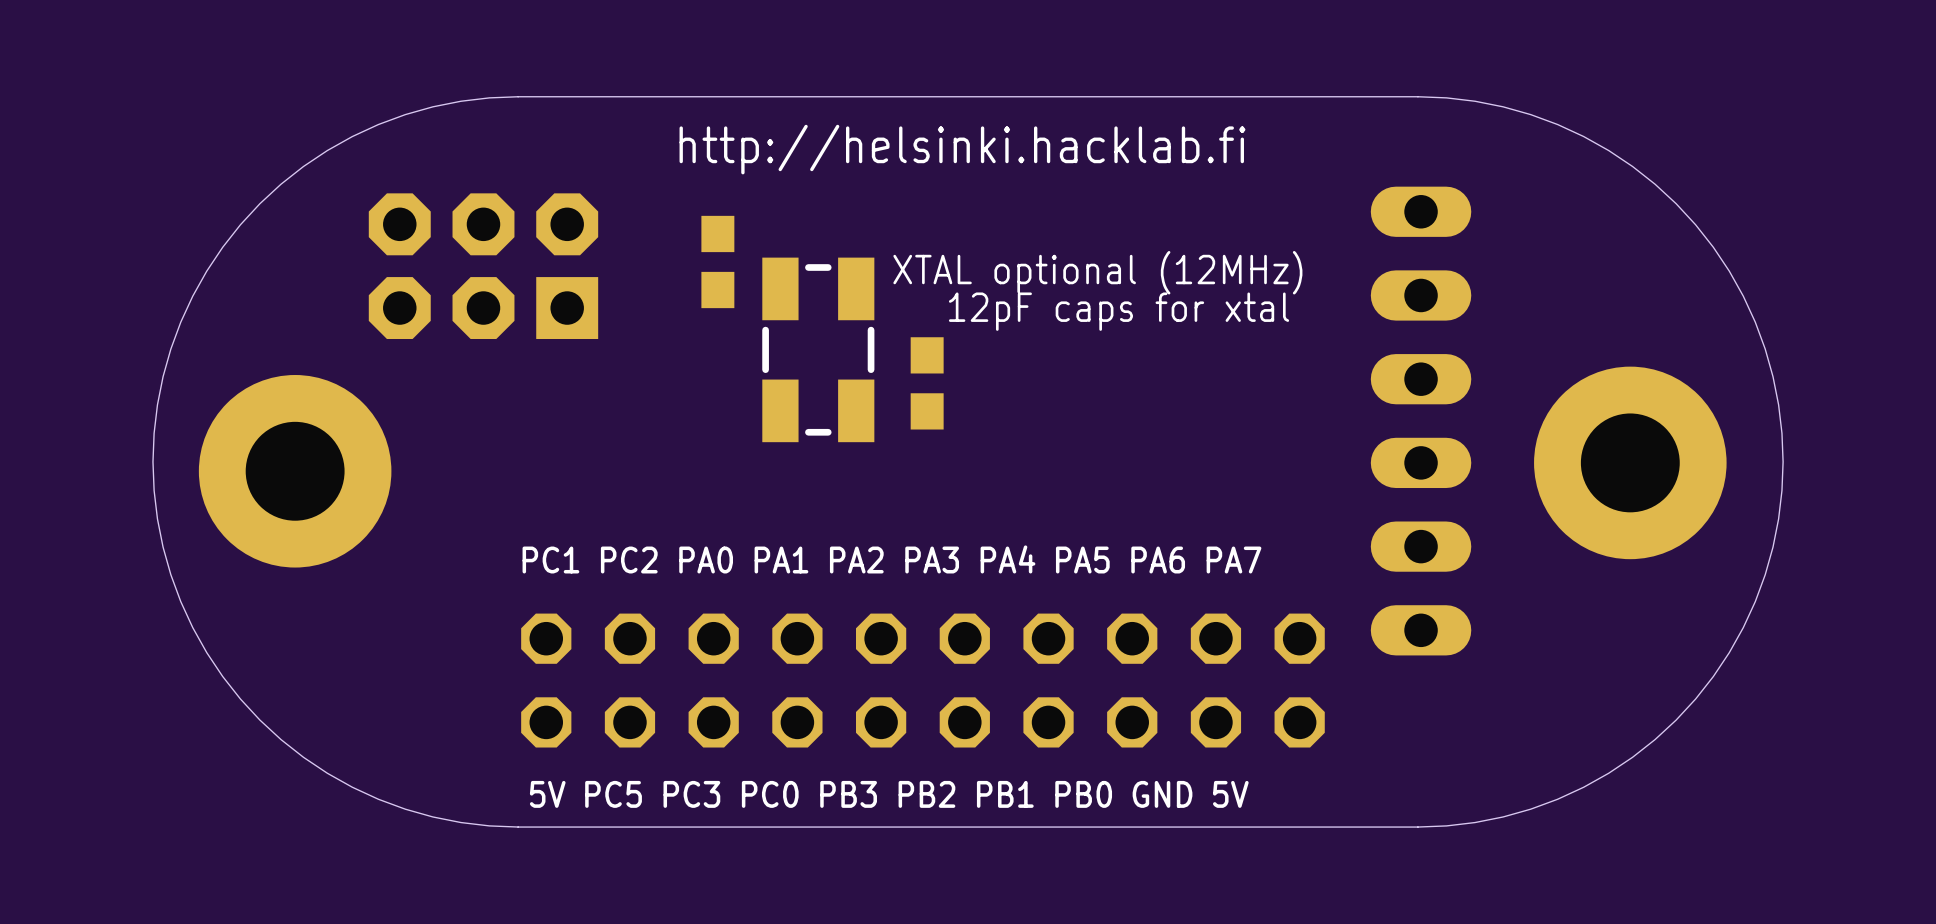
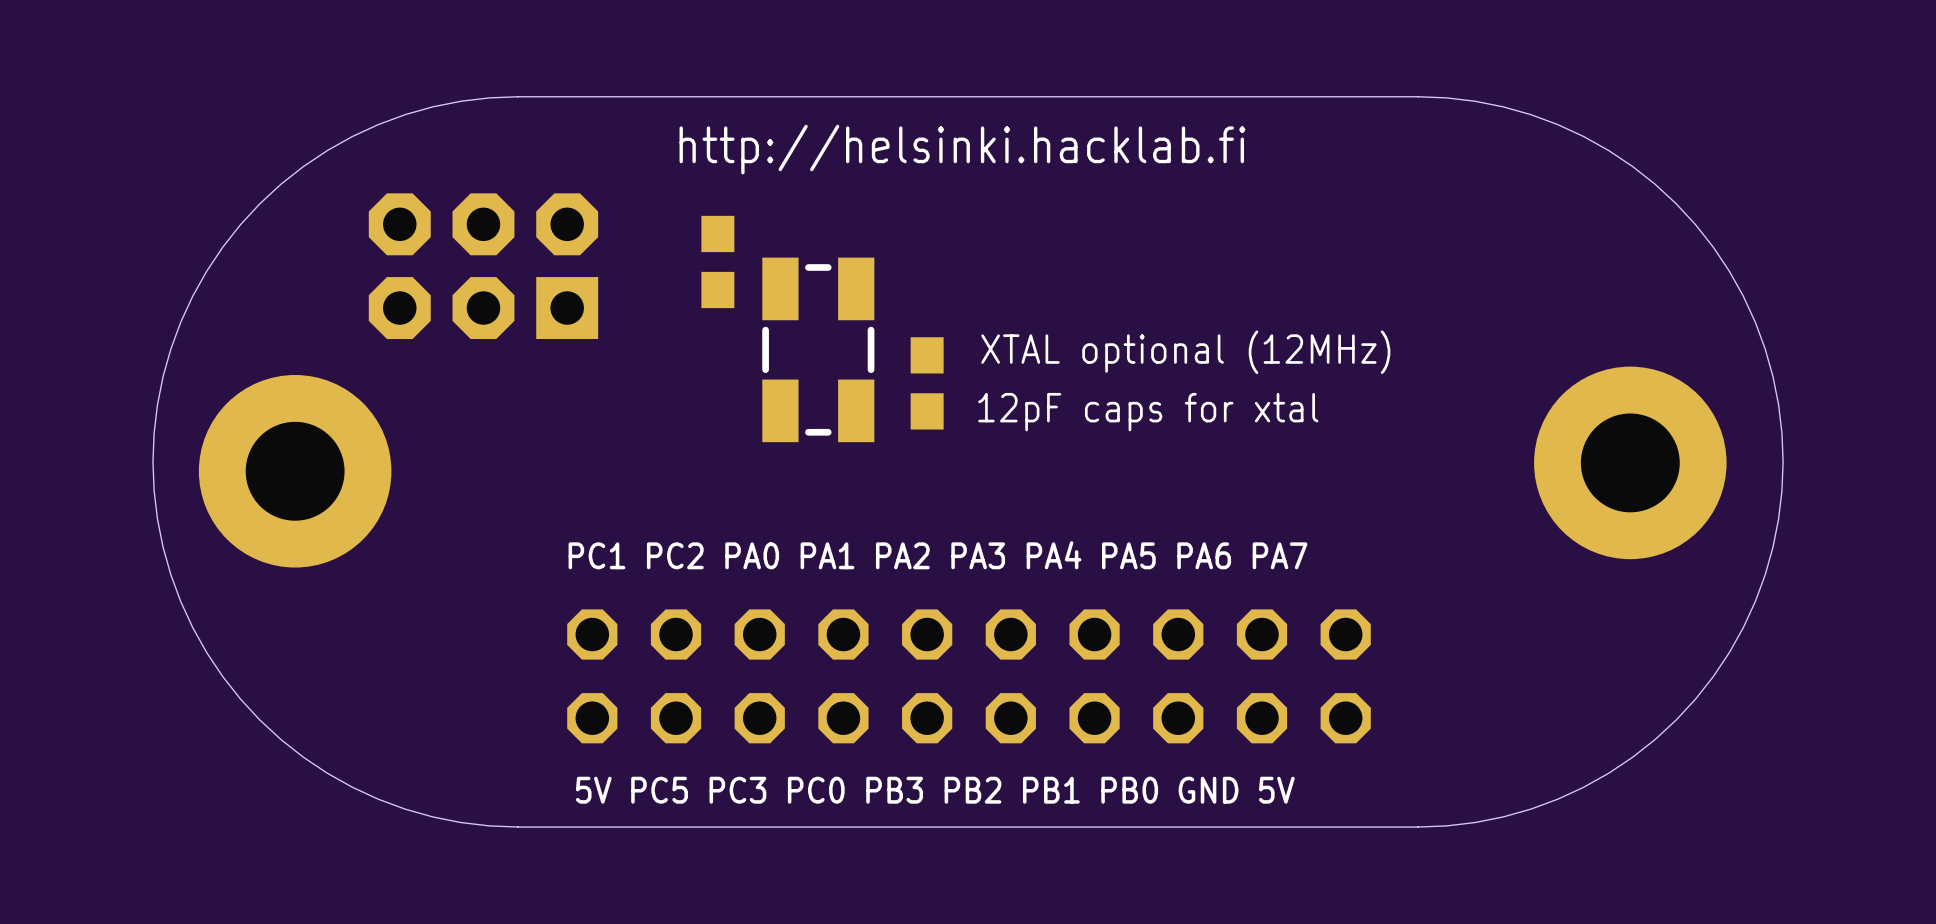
text position: XTAL optional (12MHz) (1097, 272) -> XTAL optional (12MHz) (1185, 352)
text position: 12pF caps for xtal (1119, 311) -> 12pF caps for xtal (1148, 412)
part: (1421, 421) -> none
text position: PC1 PC2 PA0 PA1 PA2 PA3 PA4 PA5 PA6 PA7 (891, 559) -> PC1 PC2 PA0 PA1 PA2 PA3 PA4 PA5 PA6 PA7 (938, 555)
part position: (922, 680) -> (969, 676)
text position: 5V PC5 PC3 PC0 PB3 PB2 PB1 PB0 GND 5V (889, 794) -> 5V PC5 PC3 PC0 PB3 PB2 PB1 PB0 GND 5V (935, 790)

